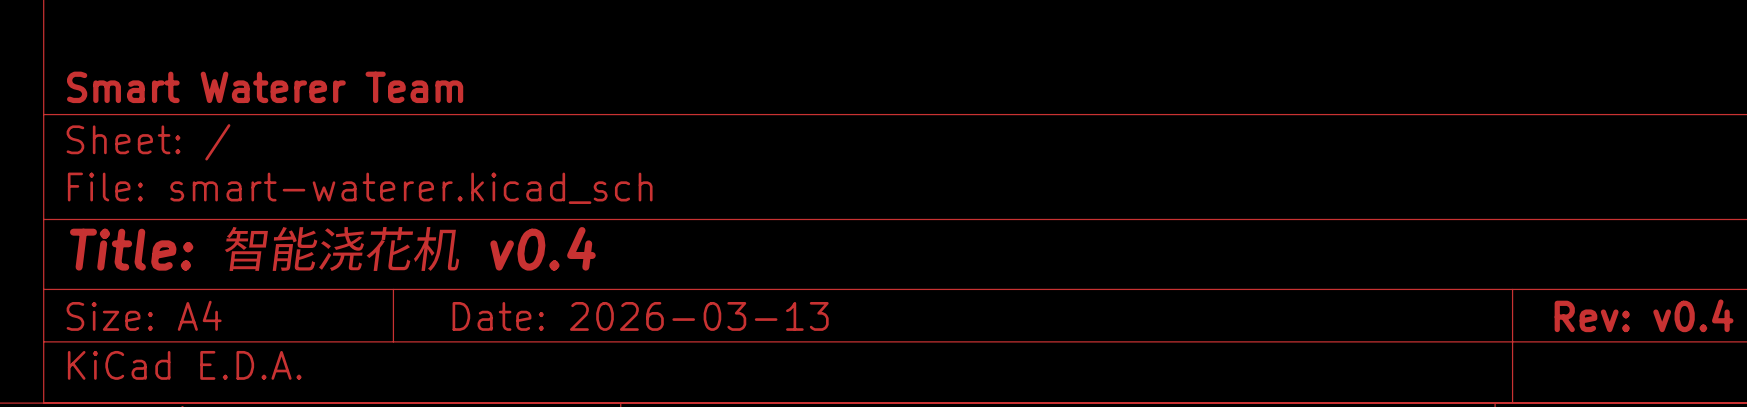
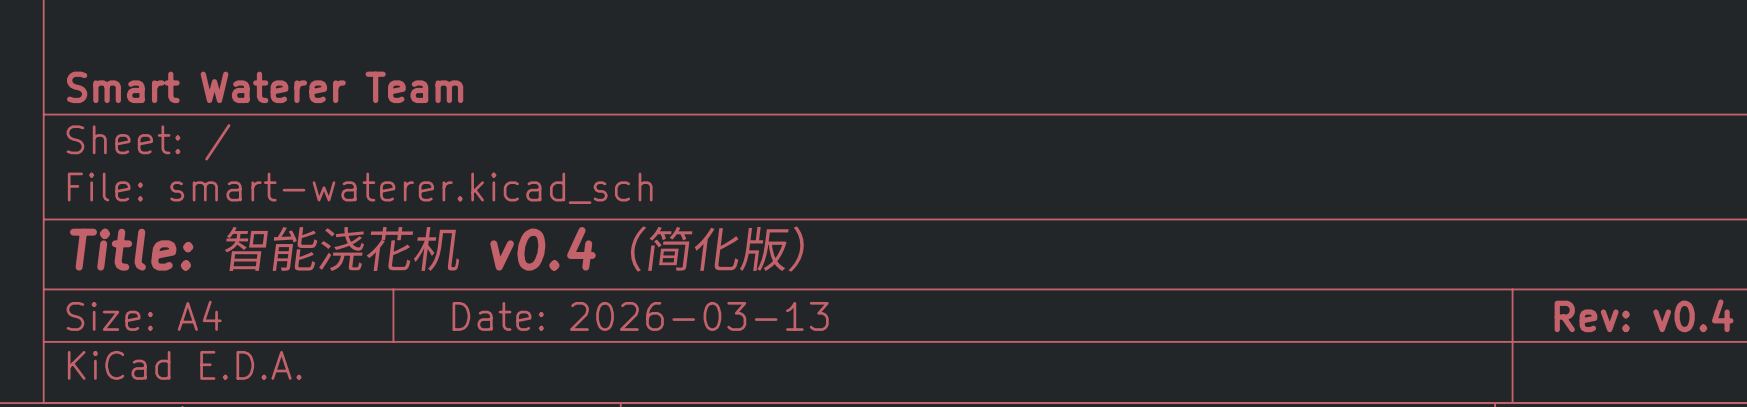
title block: Title: 智能浇花机 v0.4 (332, 248) -> Title: 智能浇花机 v0.4（简化版） (439, 249)

